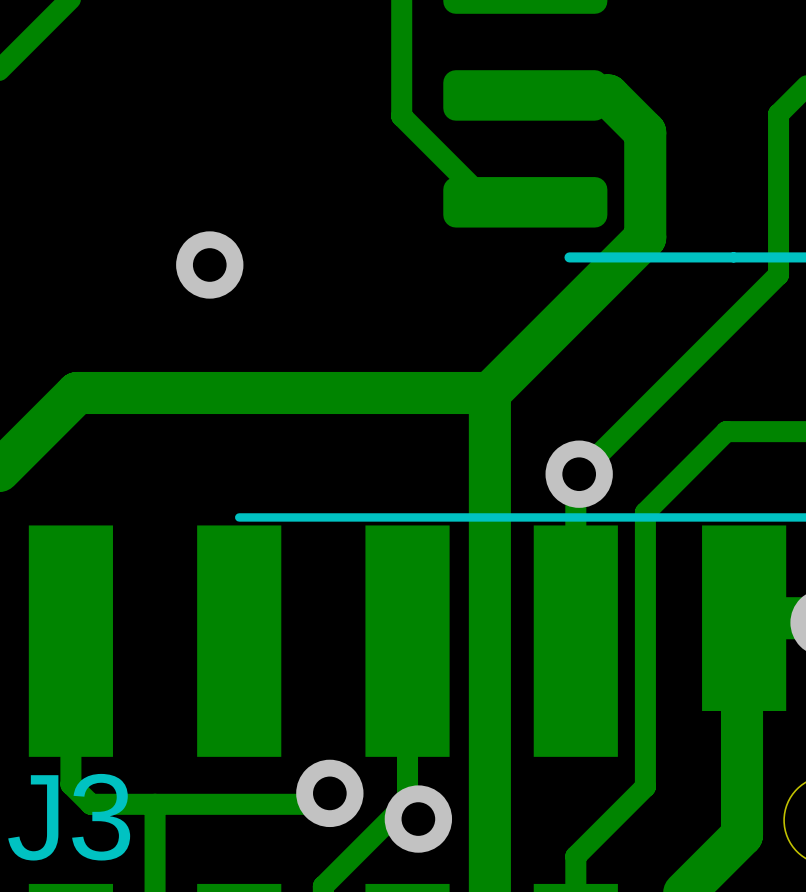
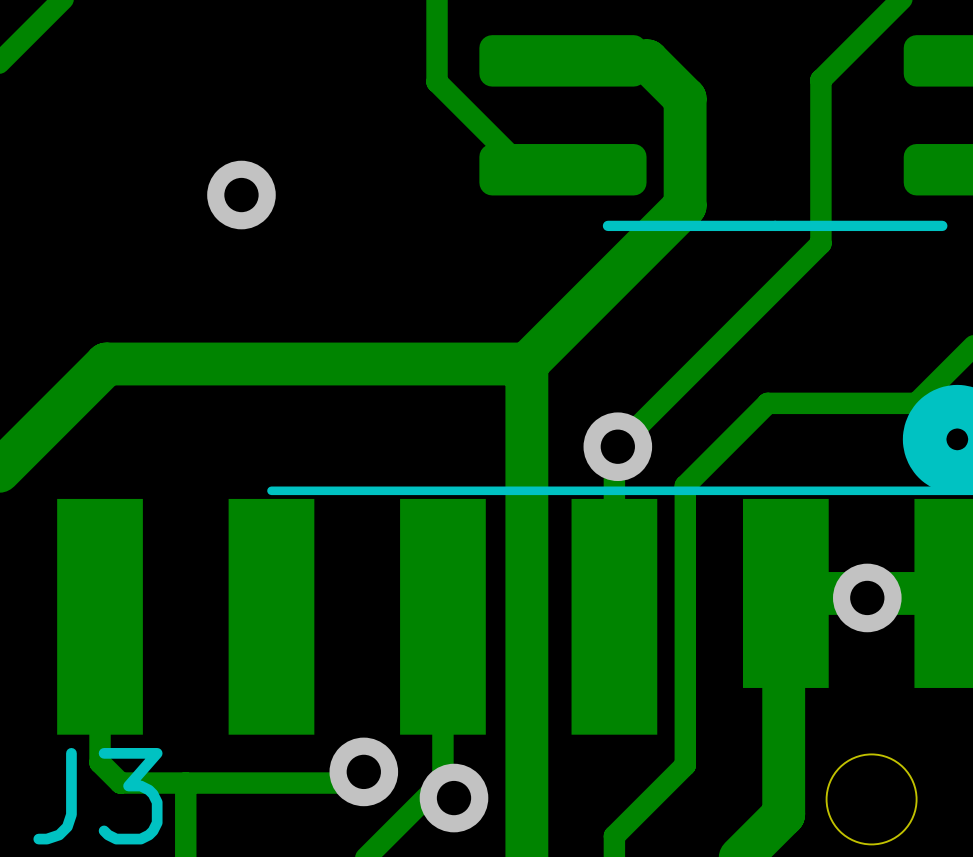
via position: (209, 265) -> (241, 195)

